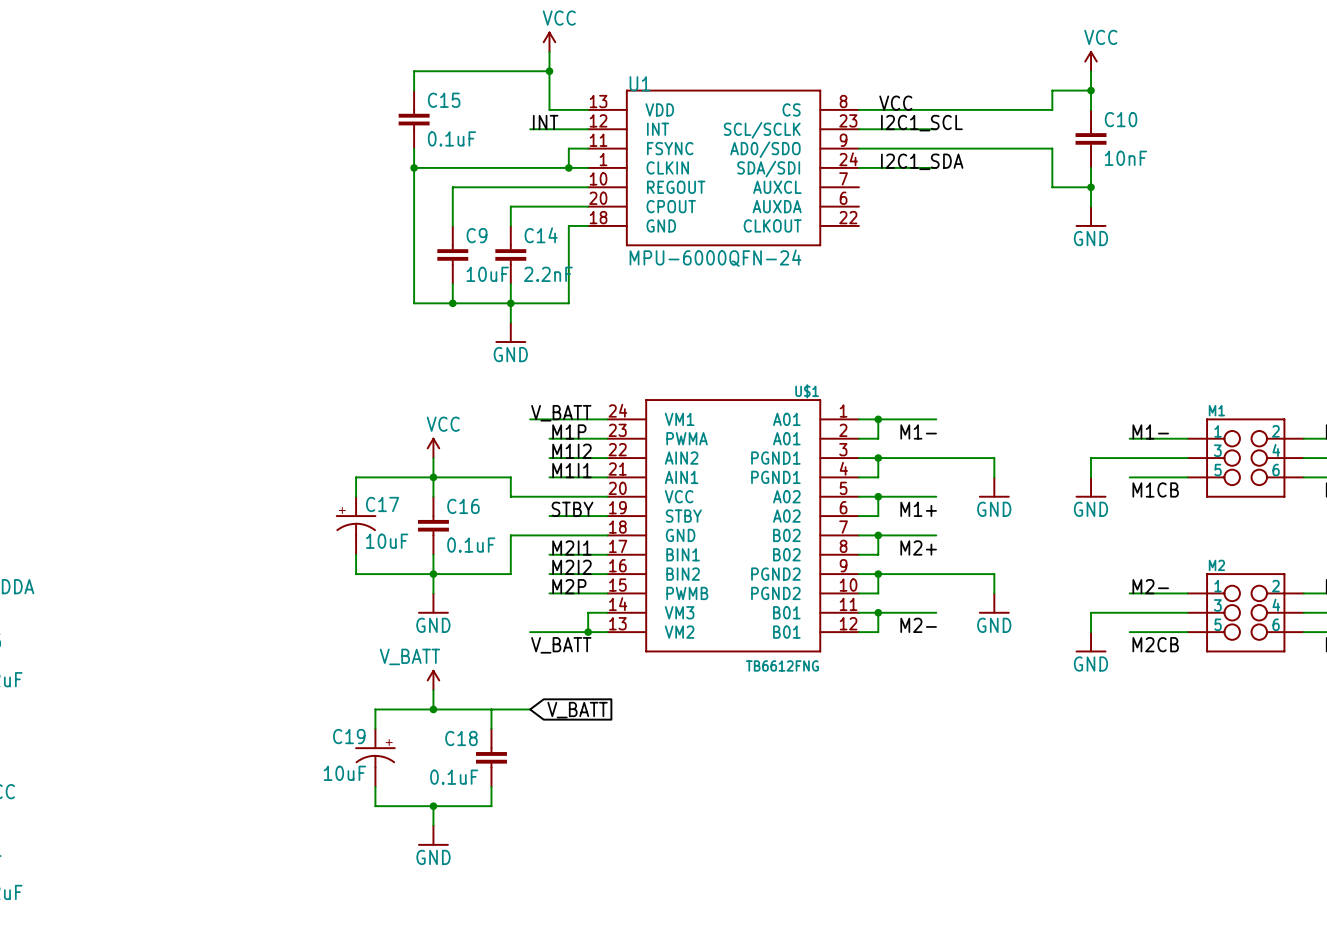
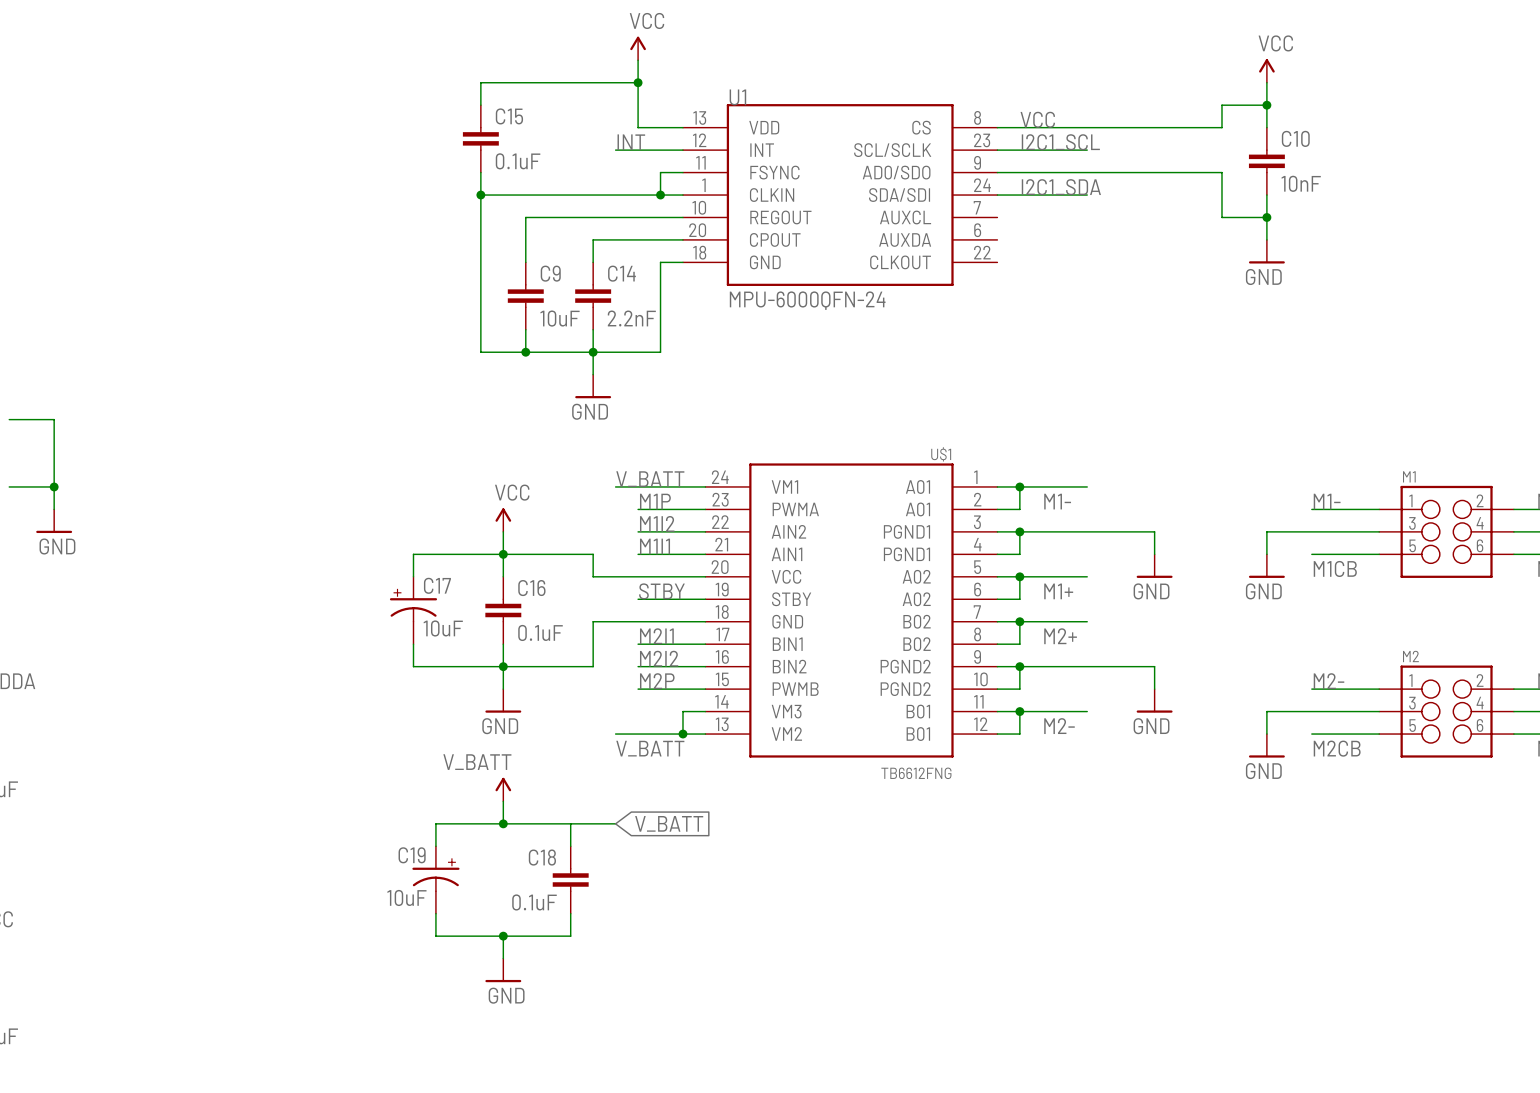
wire: none -> (9, 419) (54, 419) (54, 509)
wire: none -> (9, 486) (54, 486)
junction: none -> (54, 486)
power symbol: none -> GND (54, 521)

